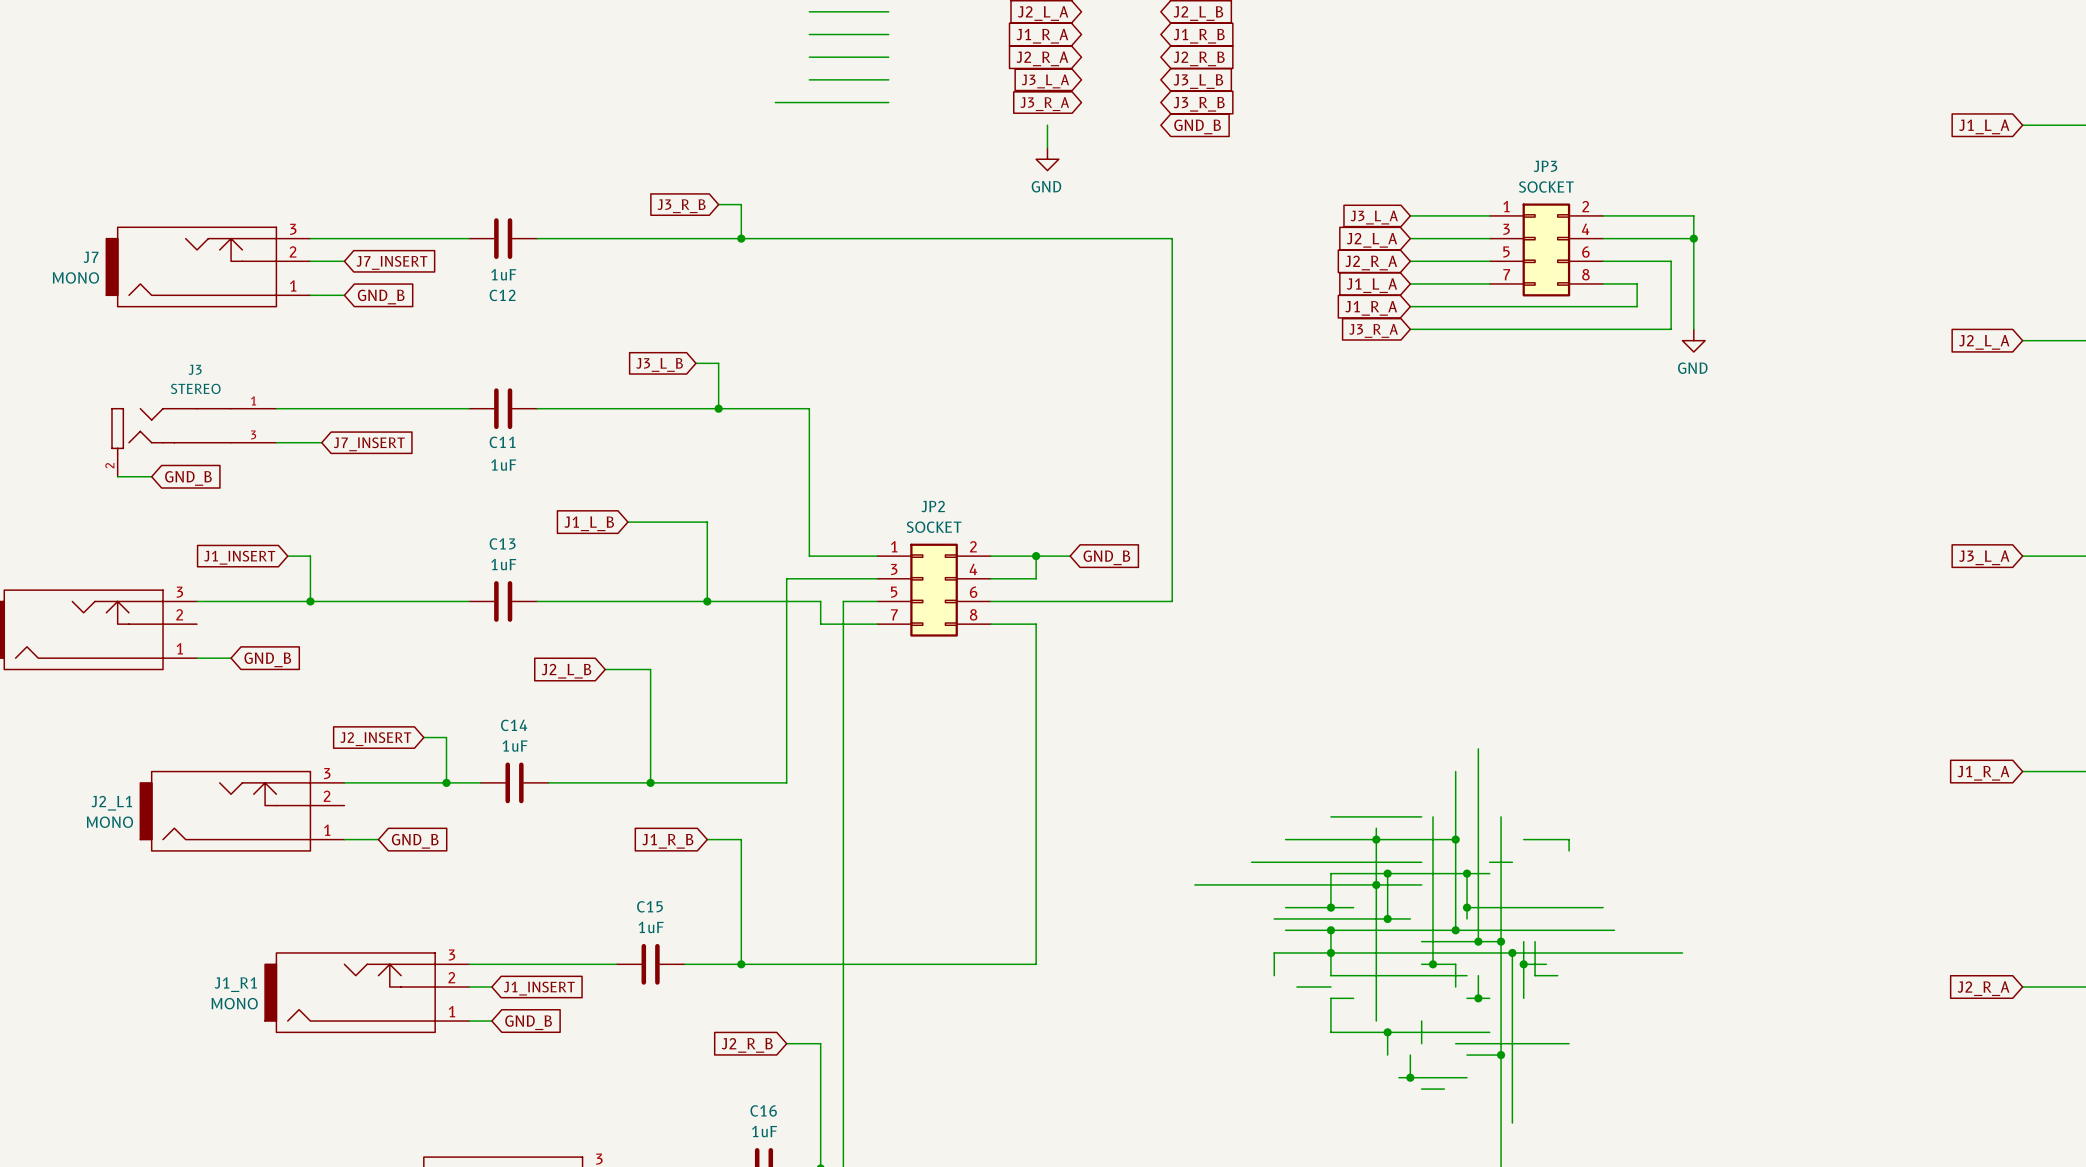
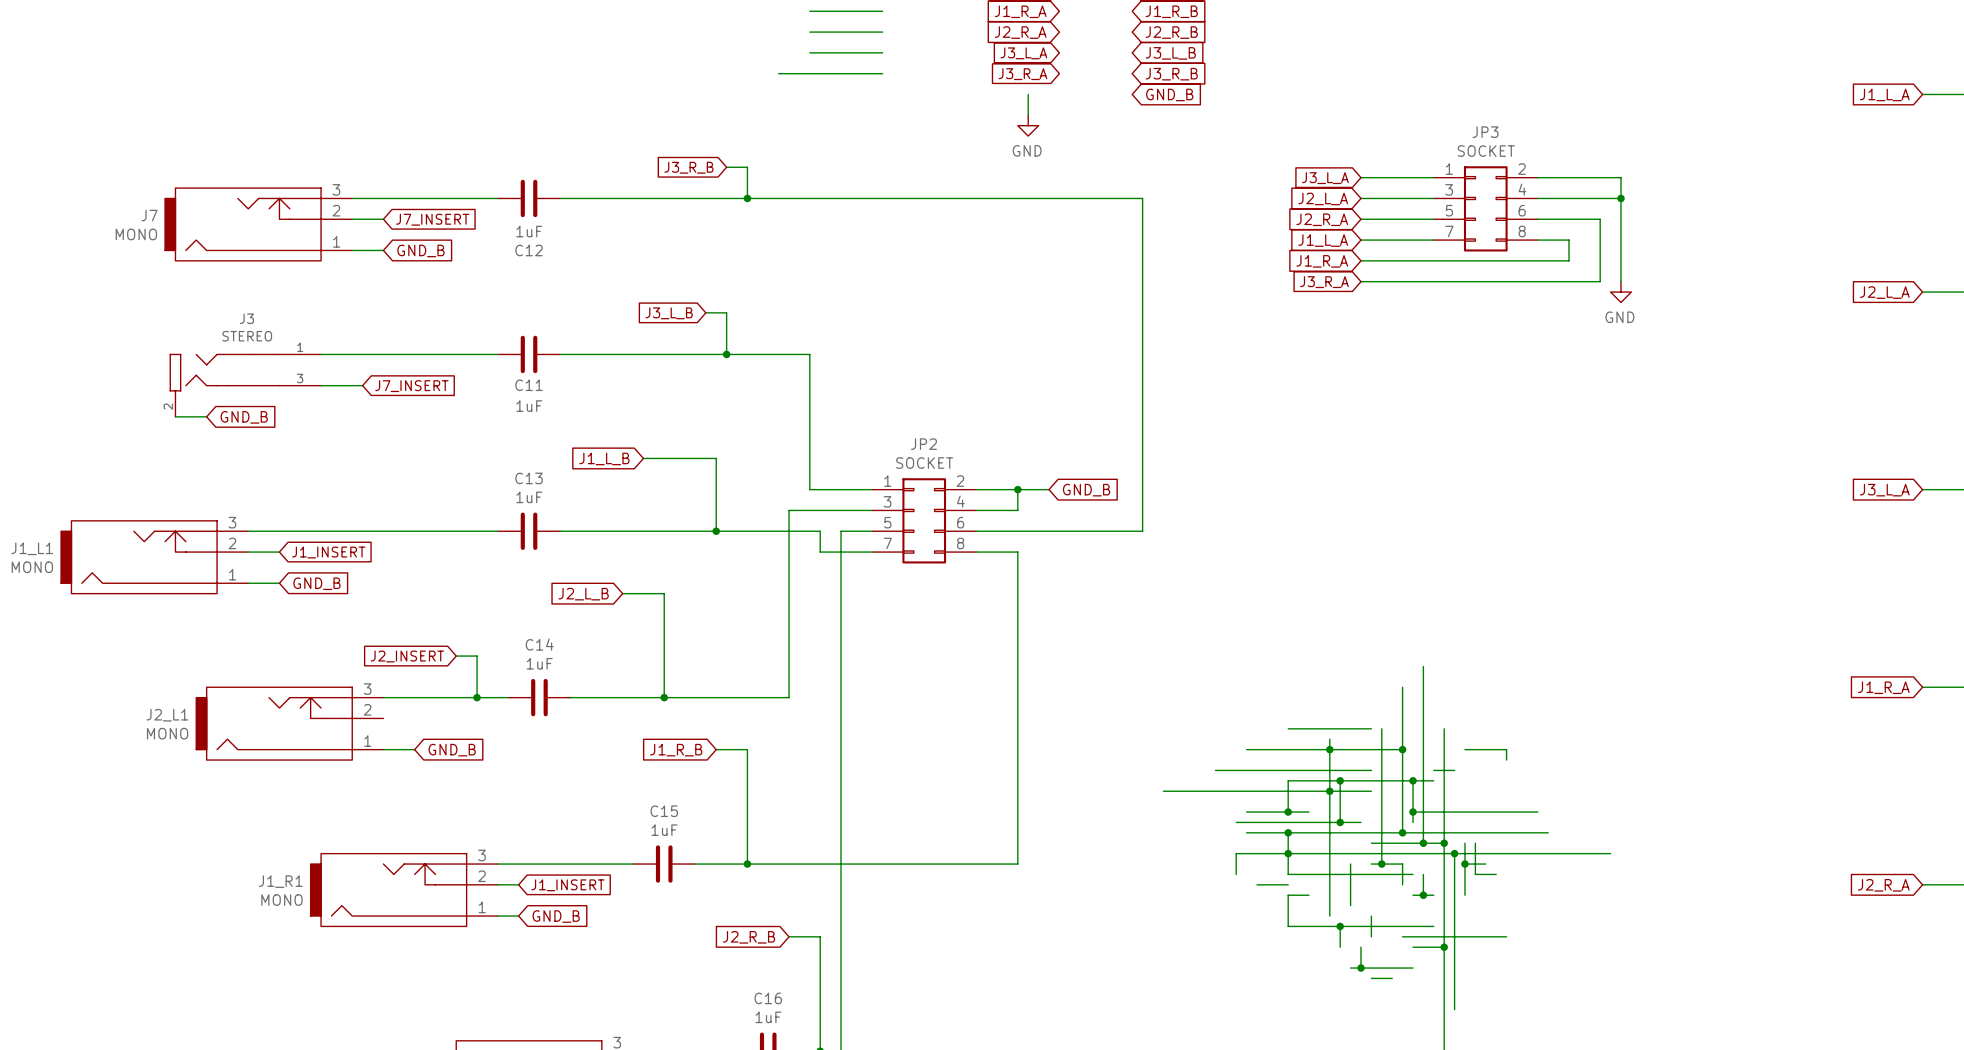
wire: (287, 556) (310, 556) (310, 601) -> none
global label rotation: 0° (239, 557) -> 180° (328, 552)
junction: (310, 601) -> none
wire: none -> (248, 552) (279, 552)
wire: none -> (1350, 864) (1350, 905)

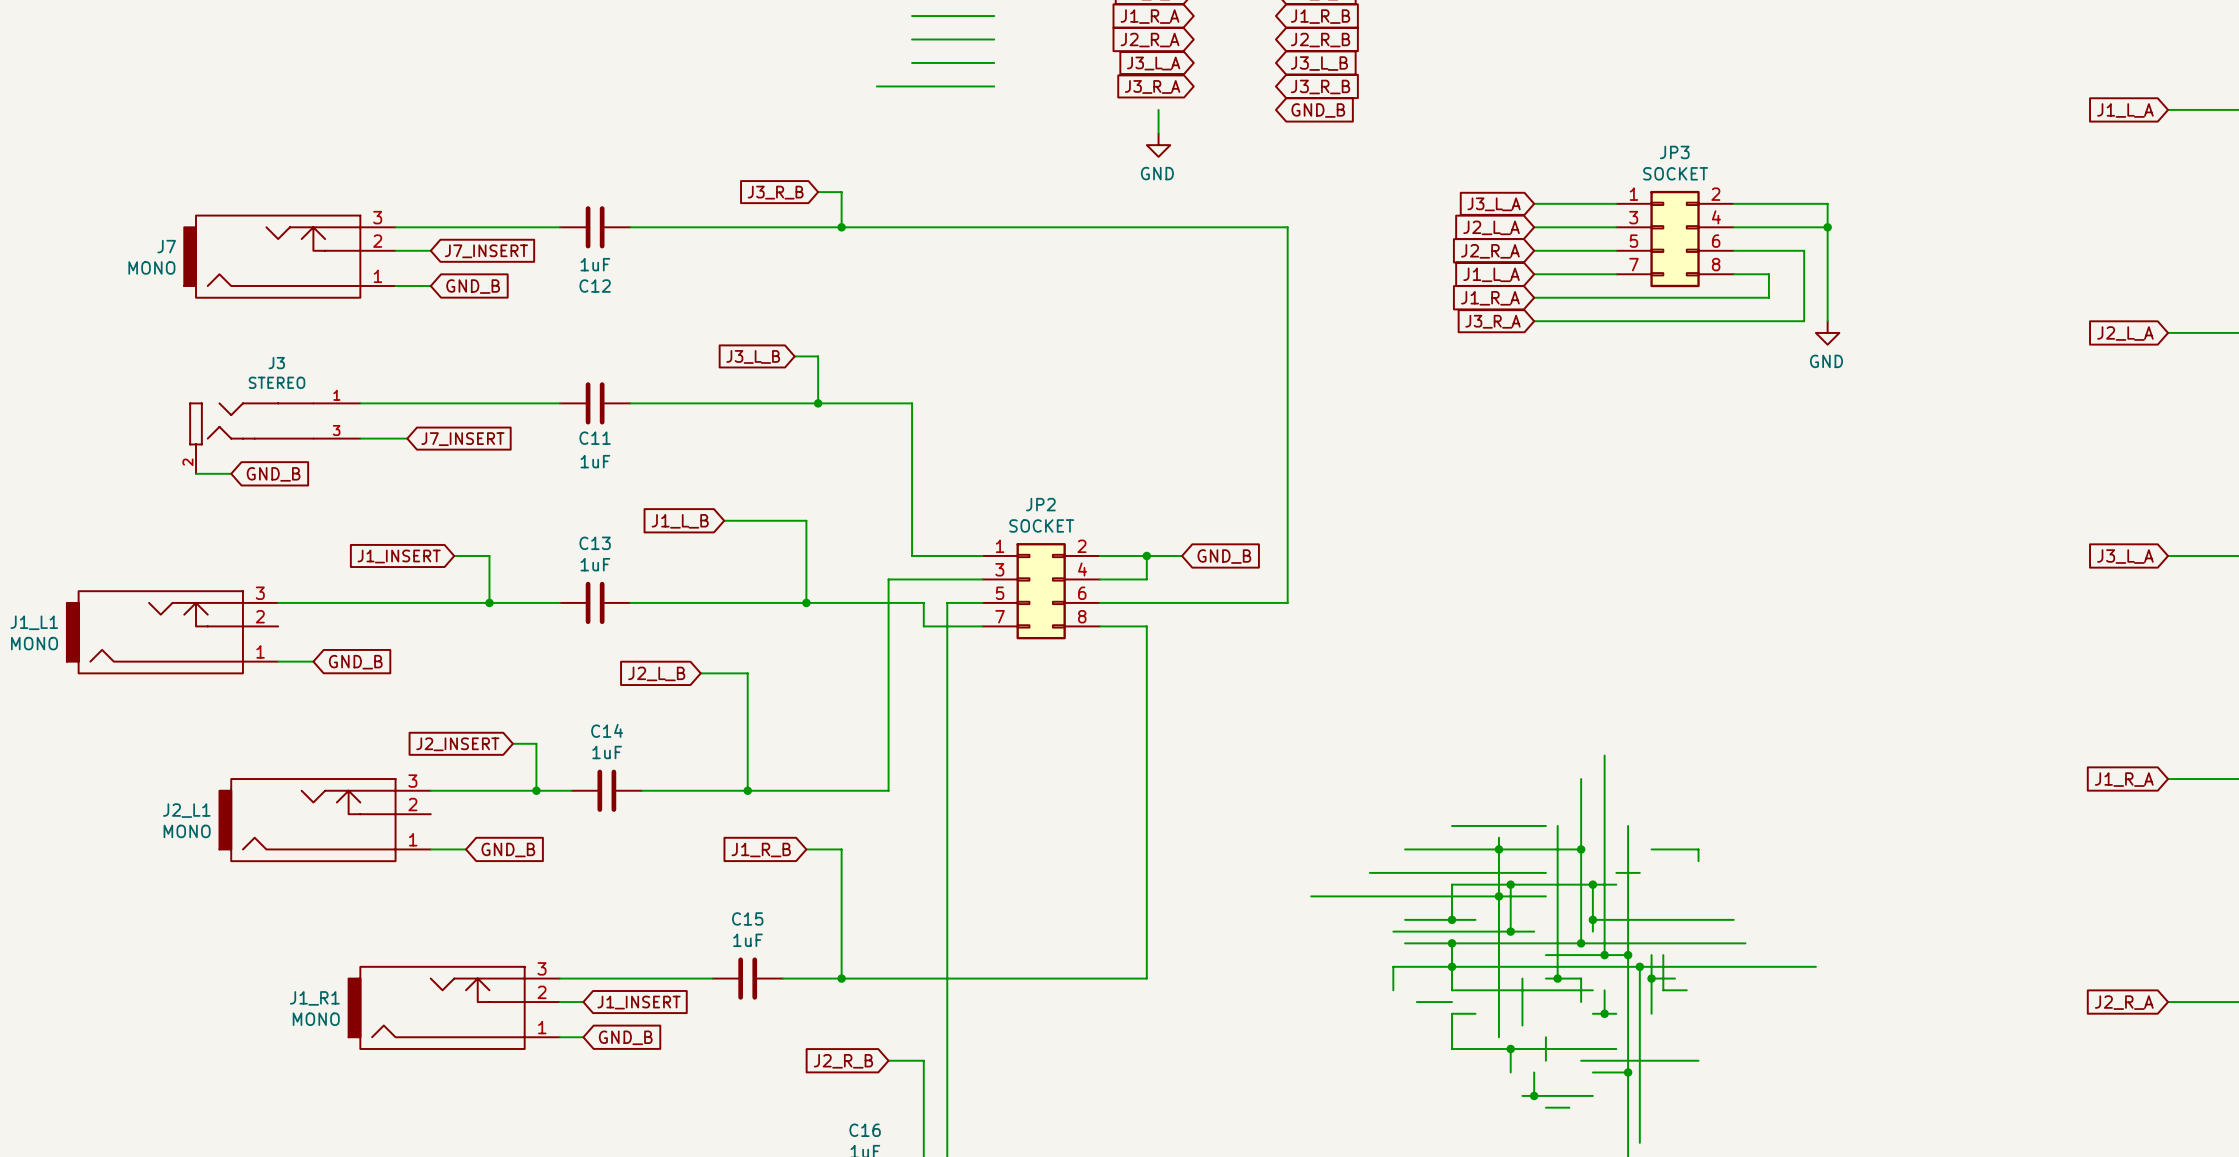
wire: none -> (454, 555) (489, 555) (489, 602)
junction: none -> (489, 602)
wire: (248, 552) (279, 552) -> none
global label rotation: 0° (328, 552) -> 180° (399, 556)

